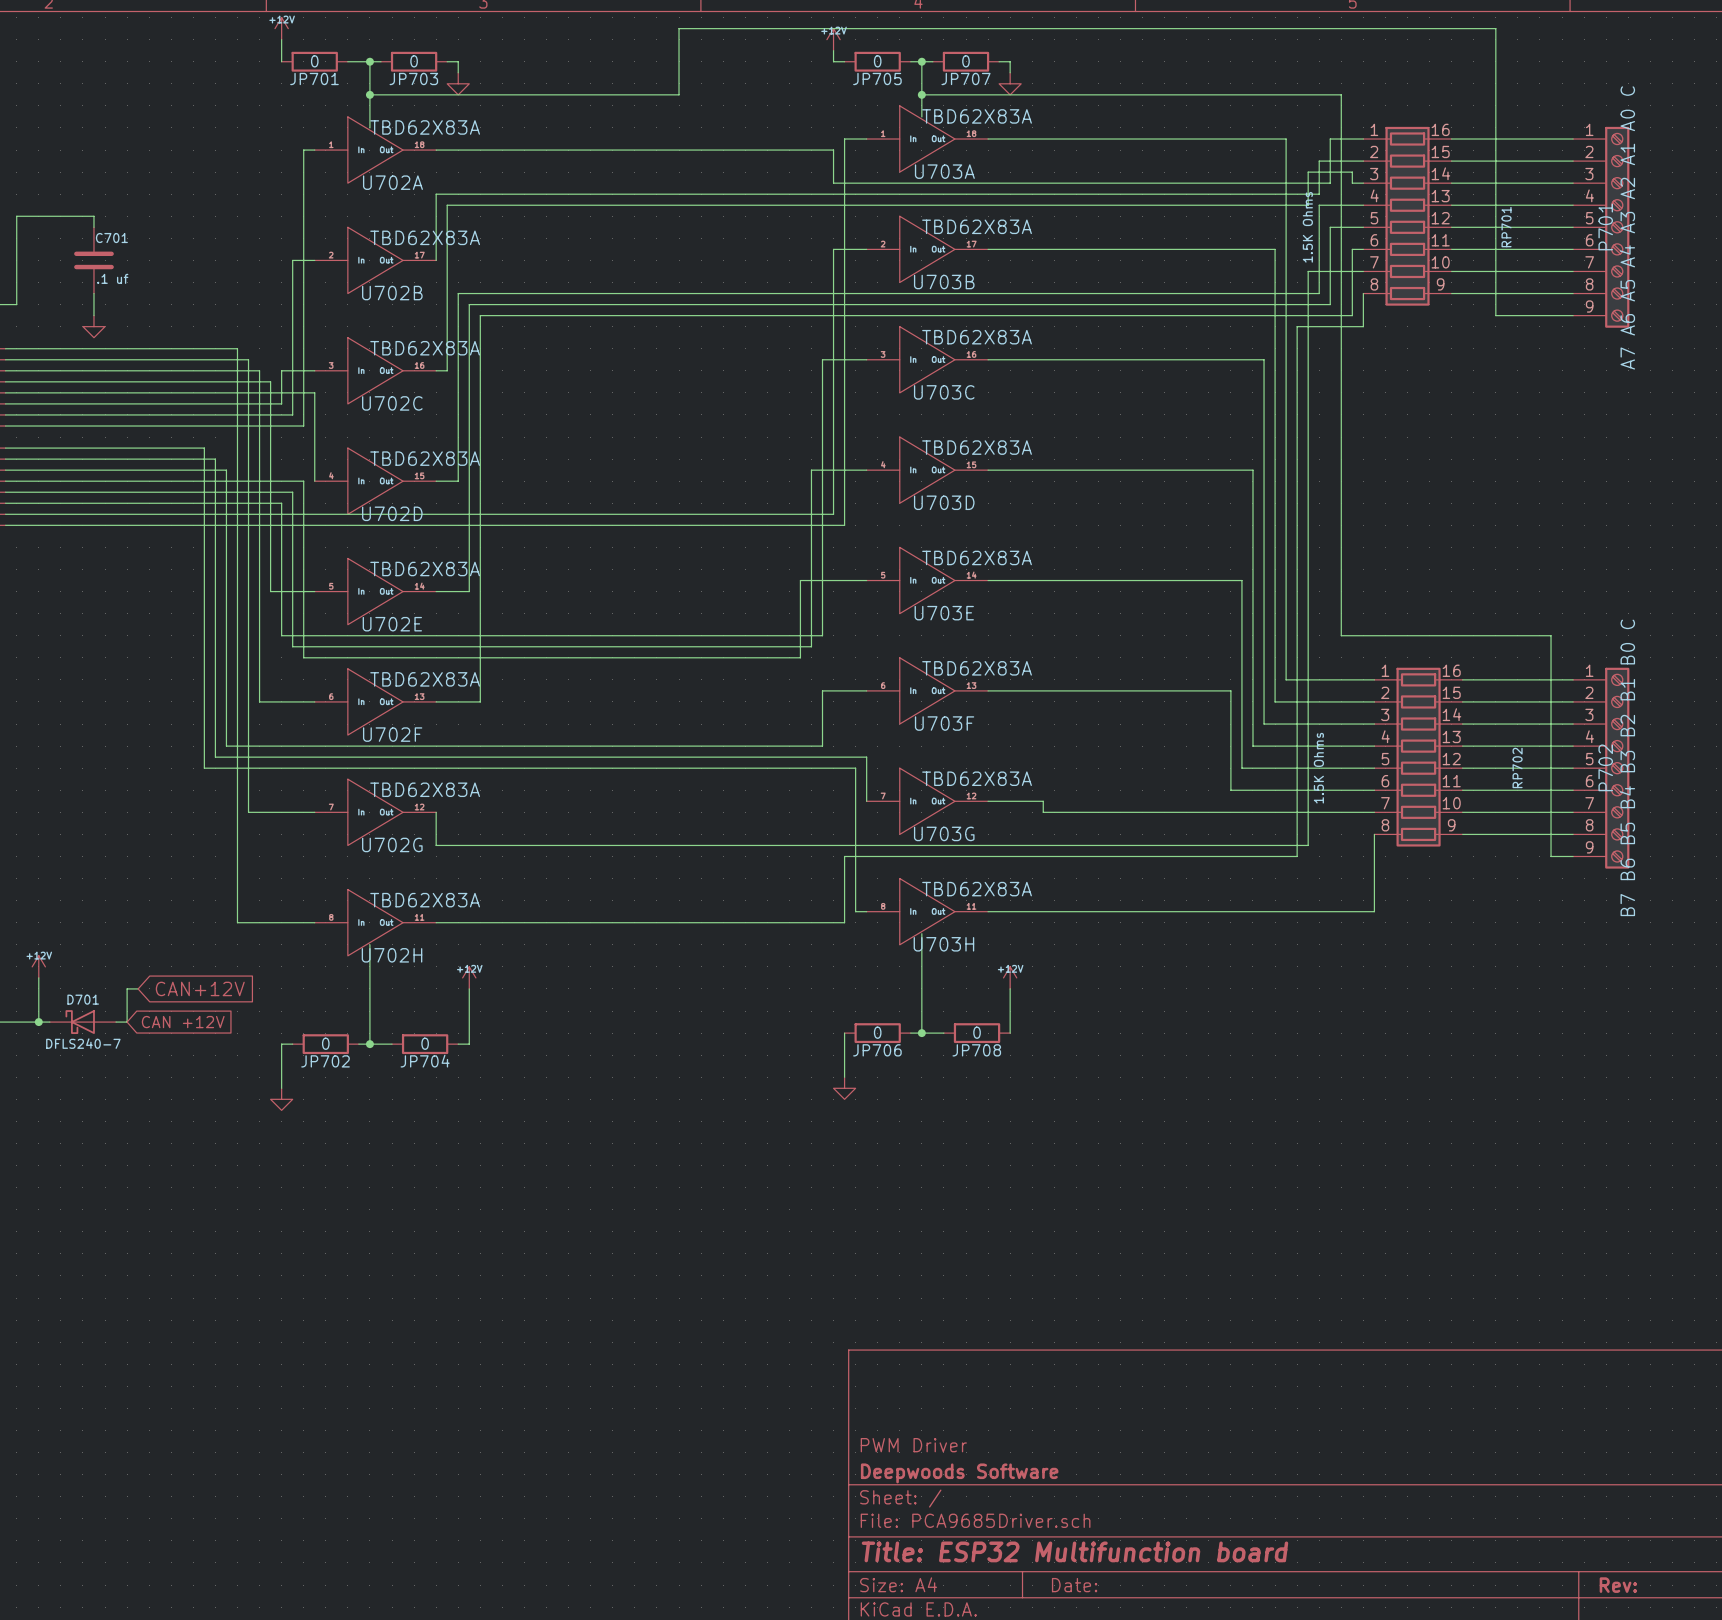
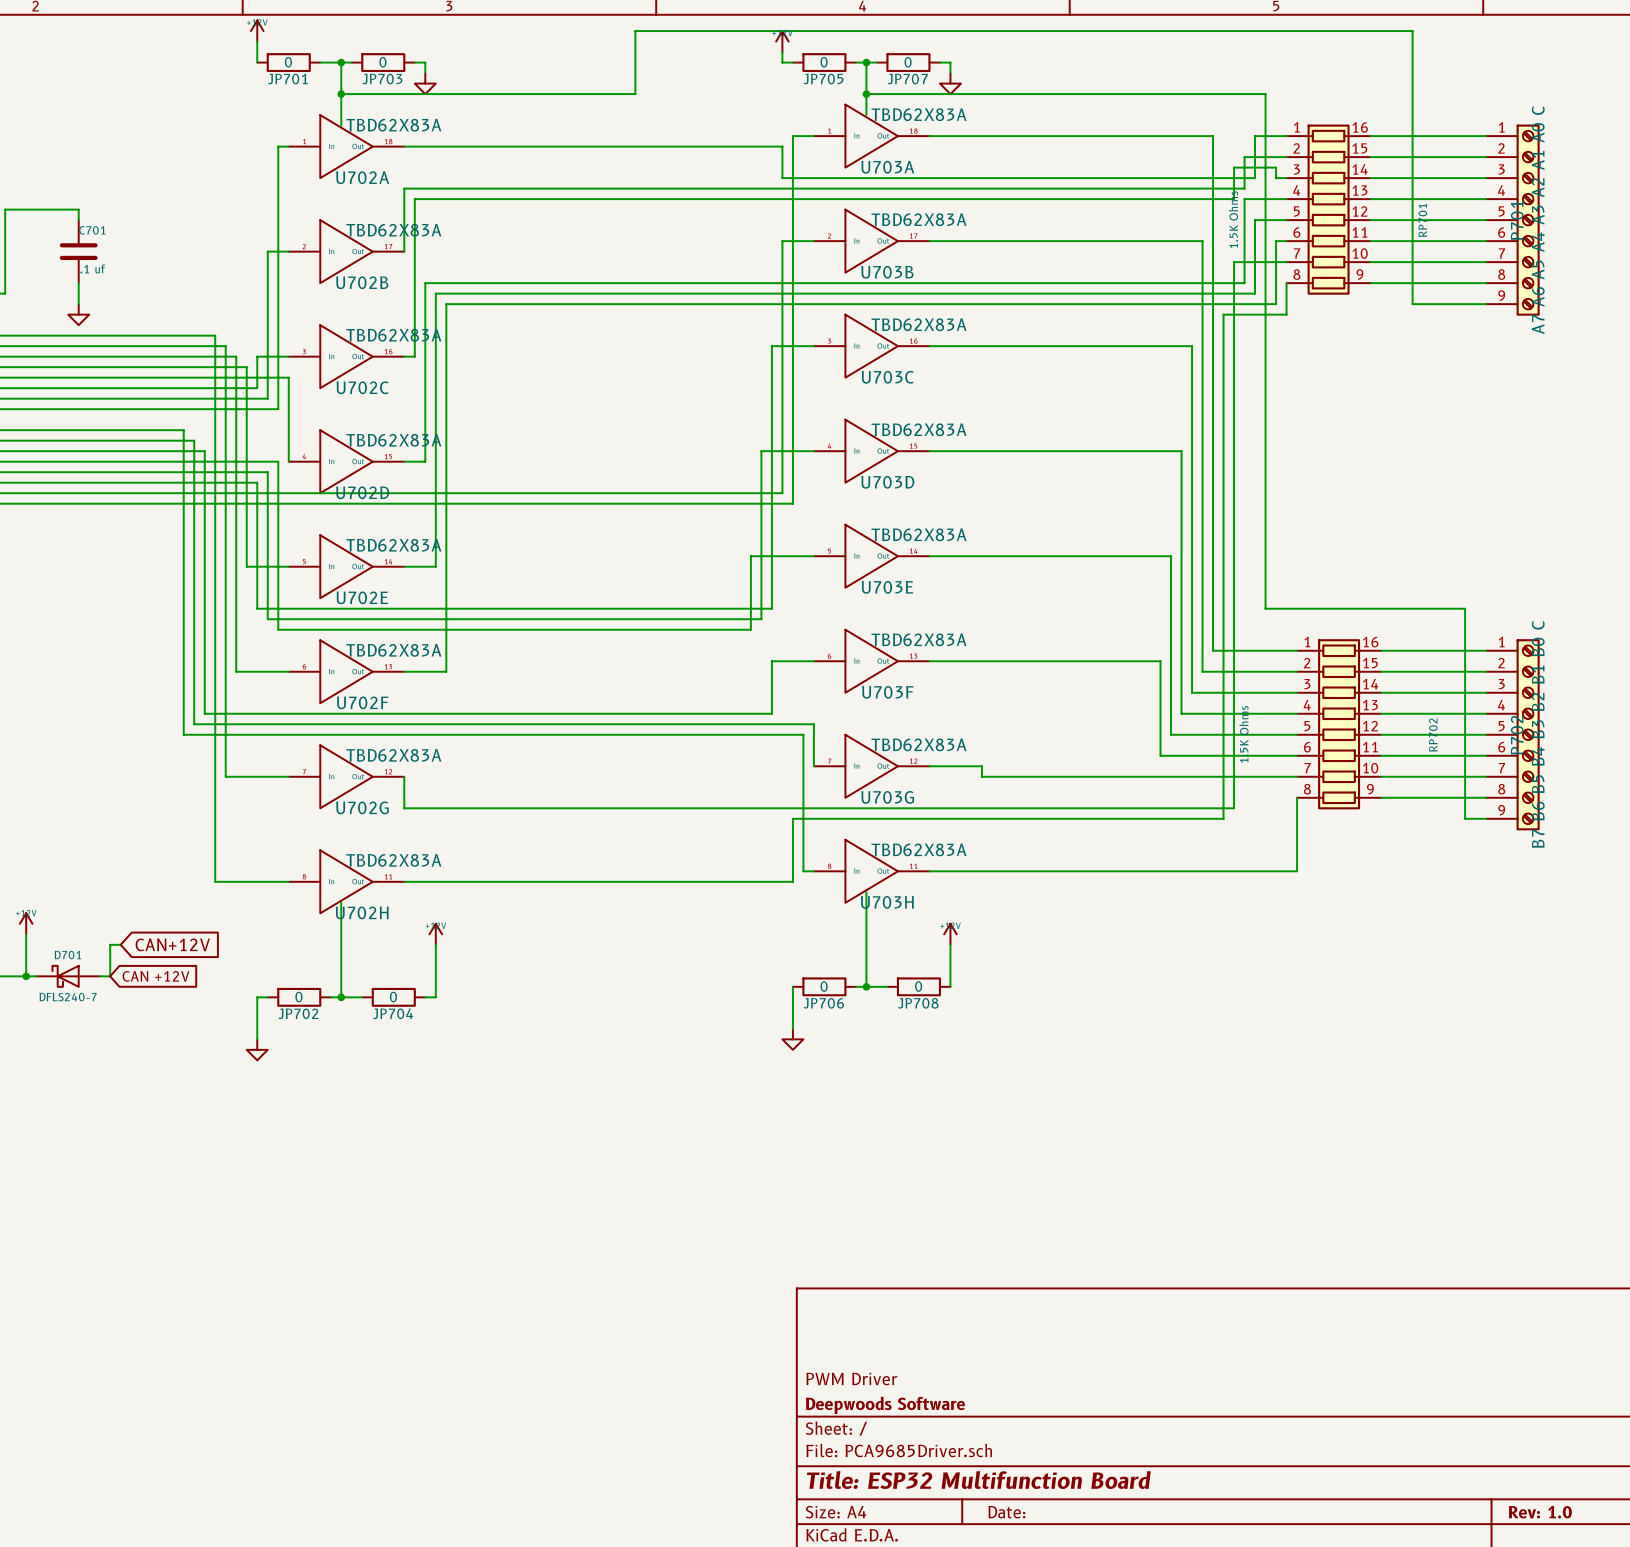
title block: Title: ESP32 Multifunction board (1074, 1551) -> Title: ESP32 Multifunction Board (978, 1480)
title block: Rev: (1618, 1585) -> Rev: 1.0 (1540, 1512)

